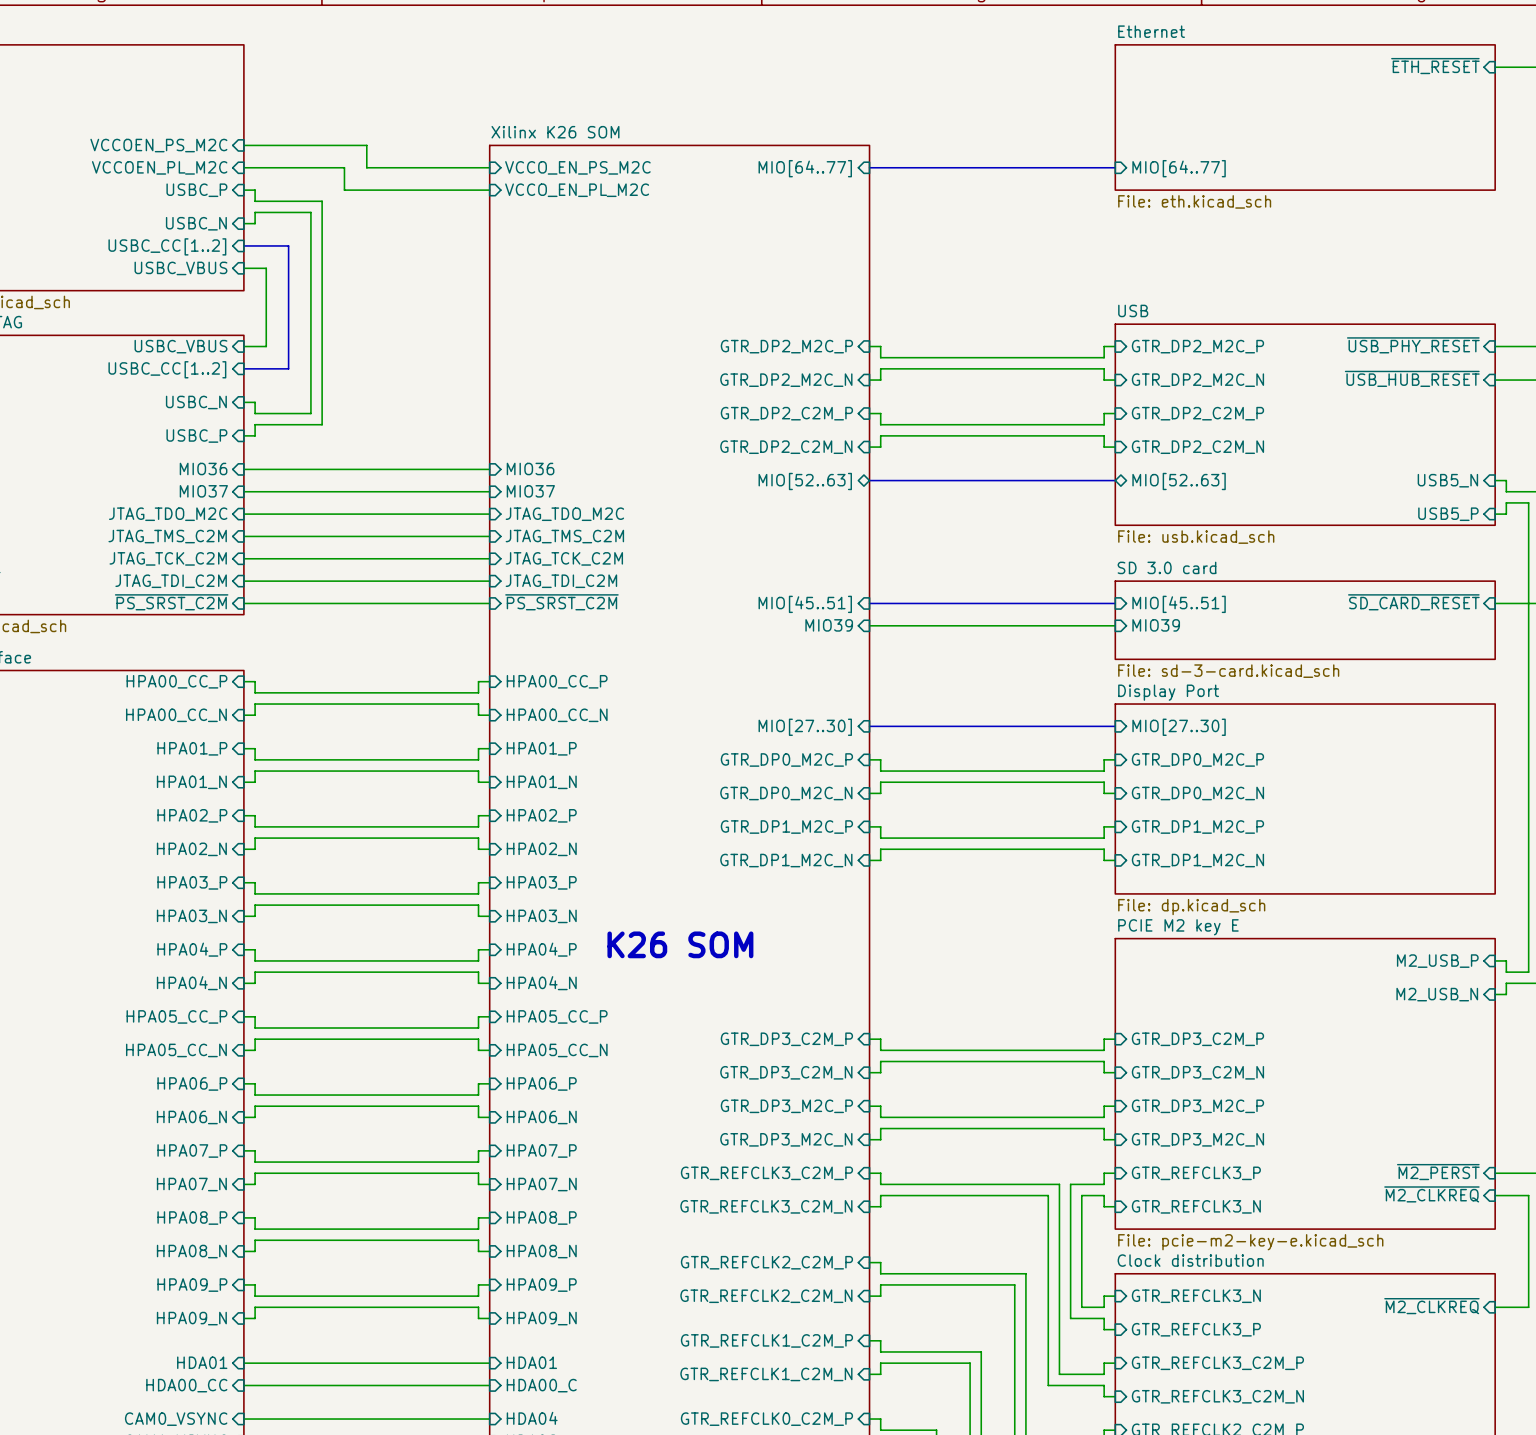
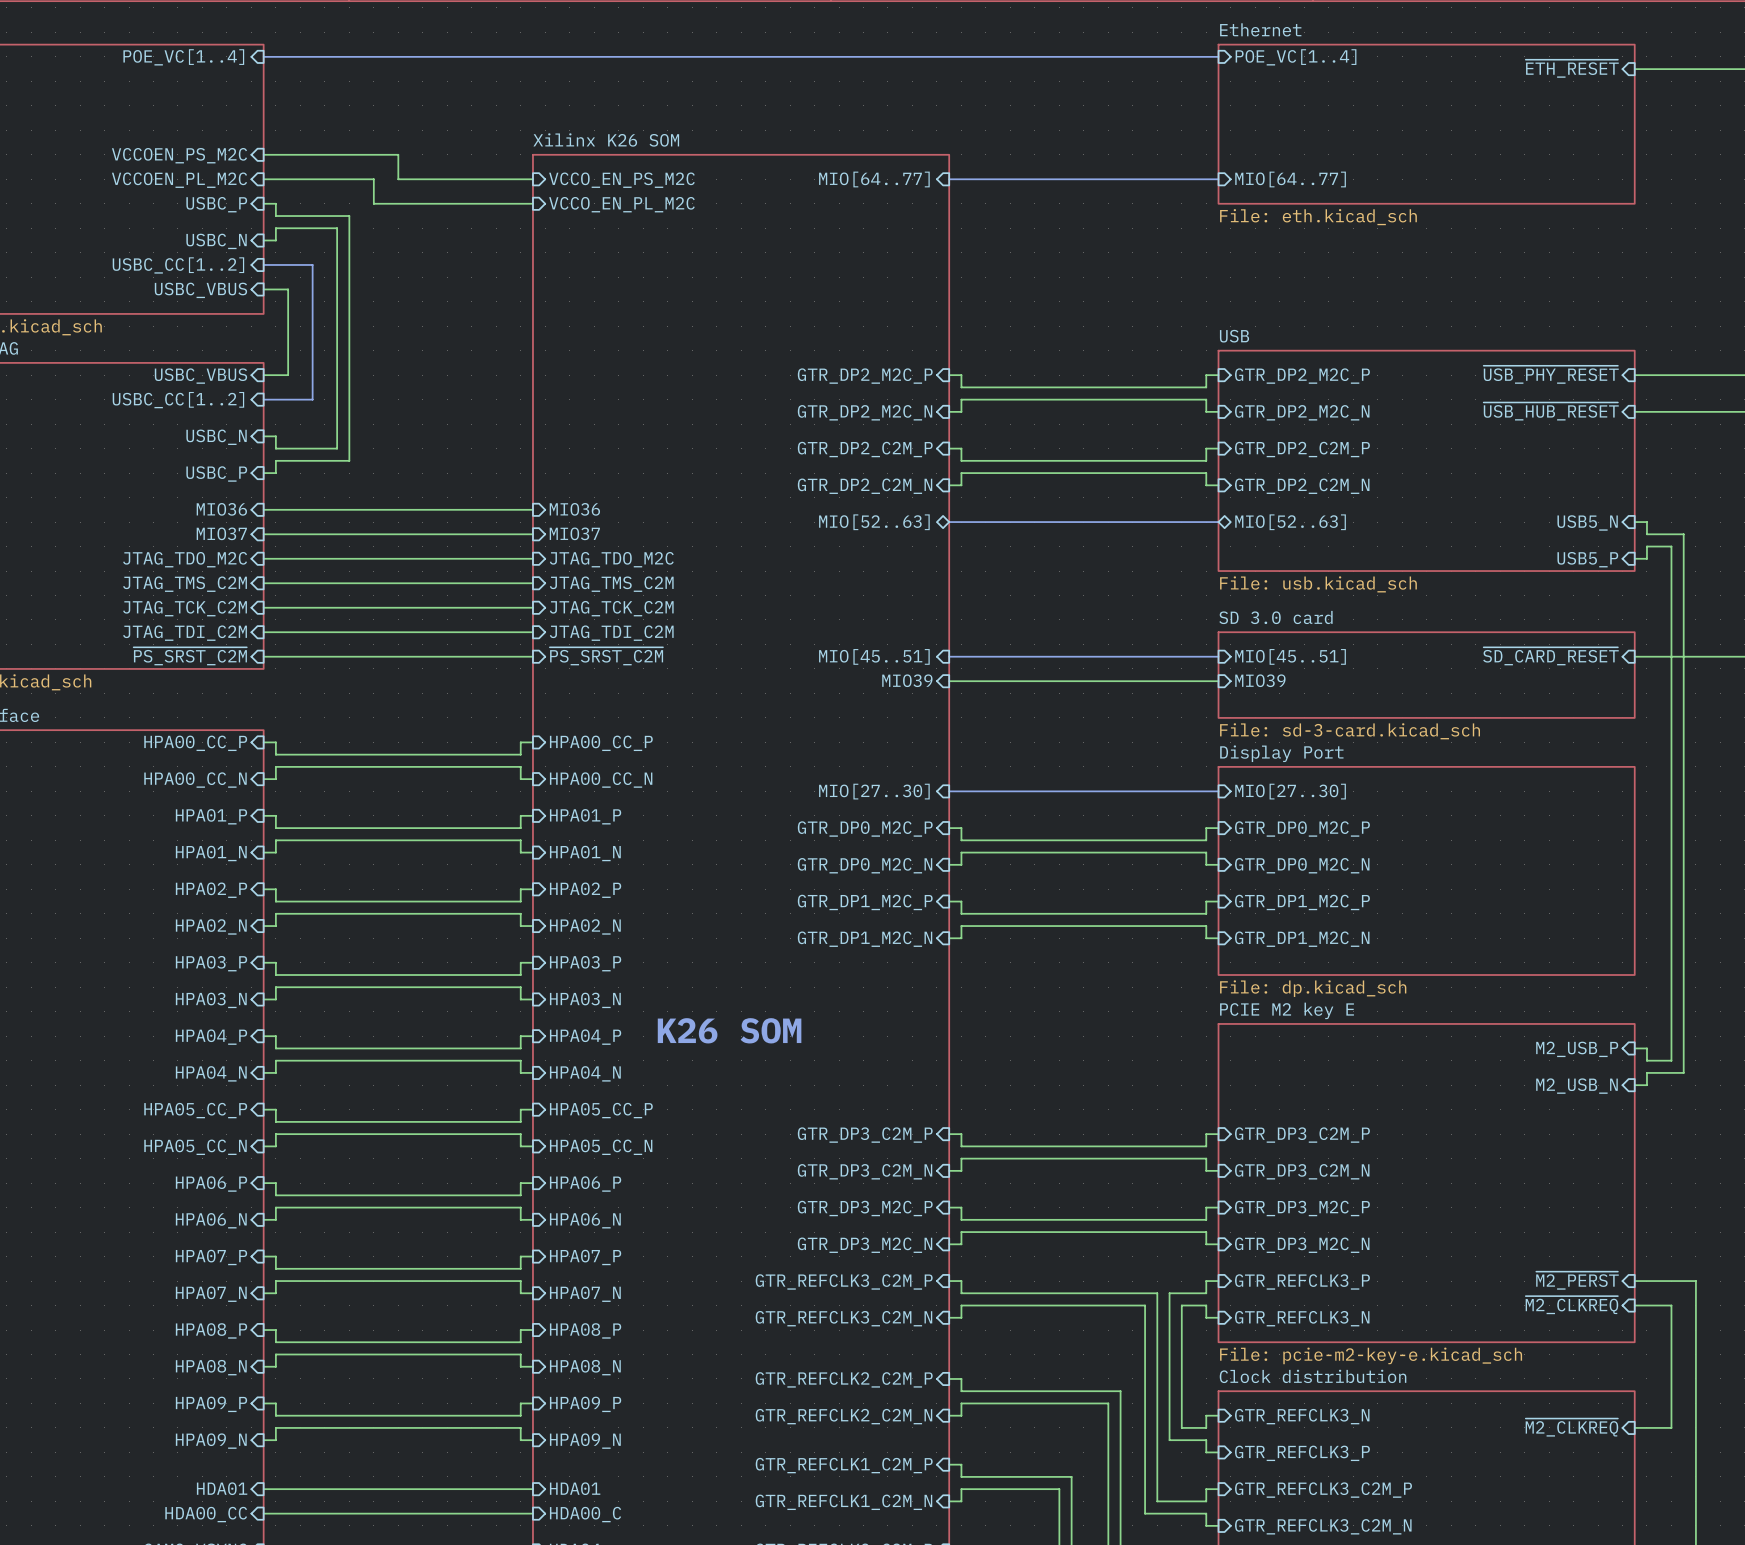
sheet pin: none -> POE_VC[1..4] (183, 57)
bus: none -> (263, 56) (1218, 56)
sheet pin: none -> POE_VC[1..4] (1296, 57)

